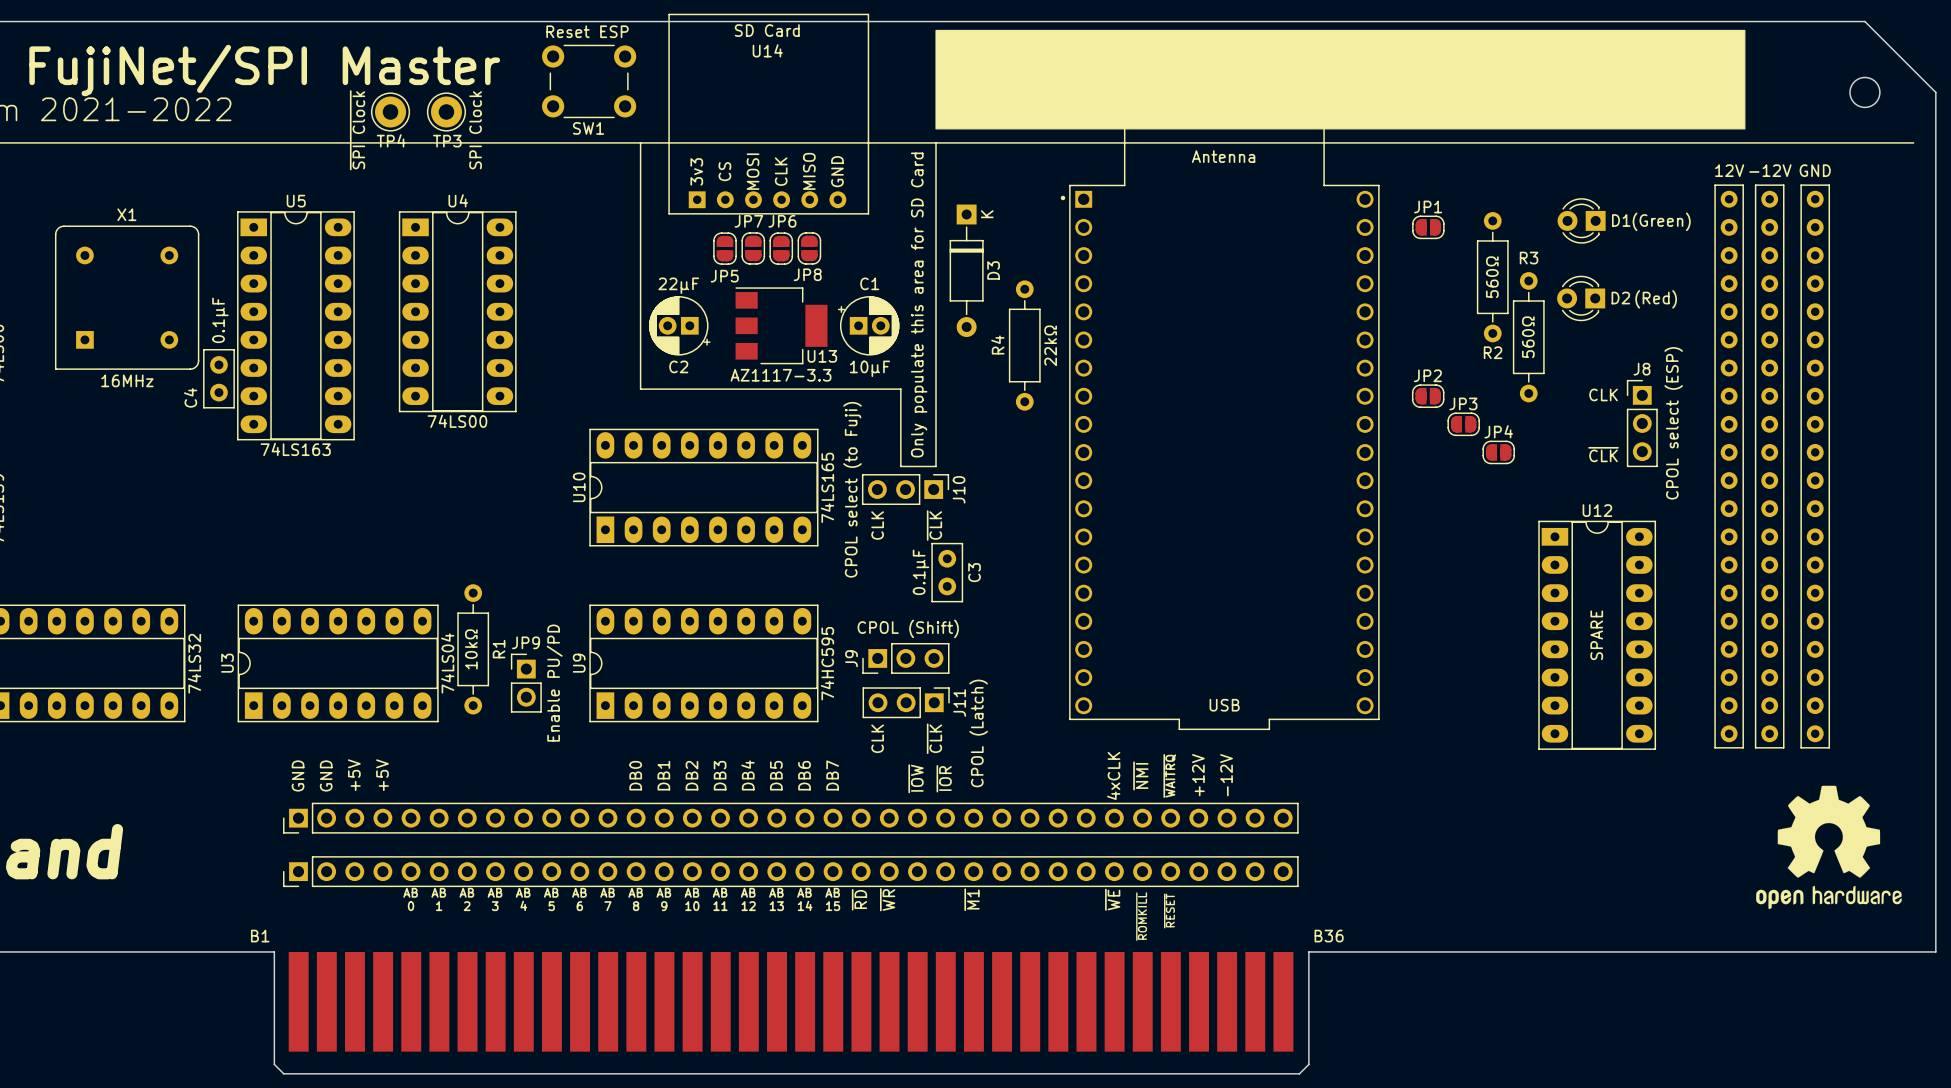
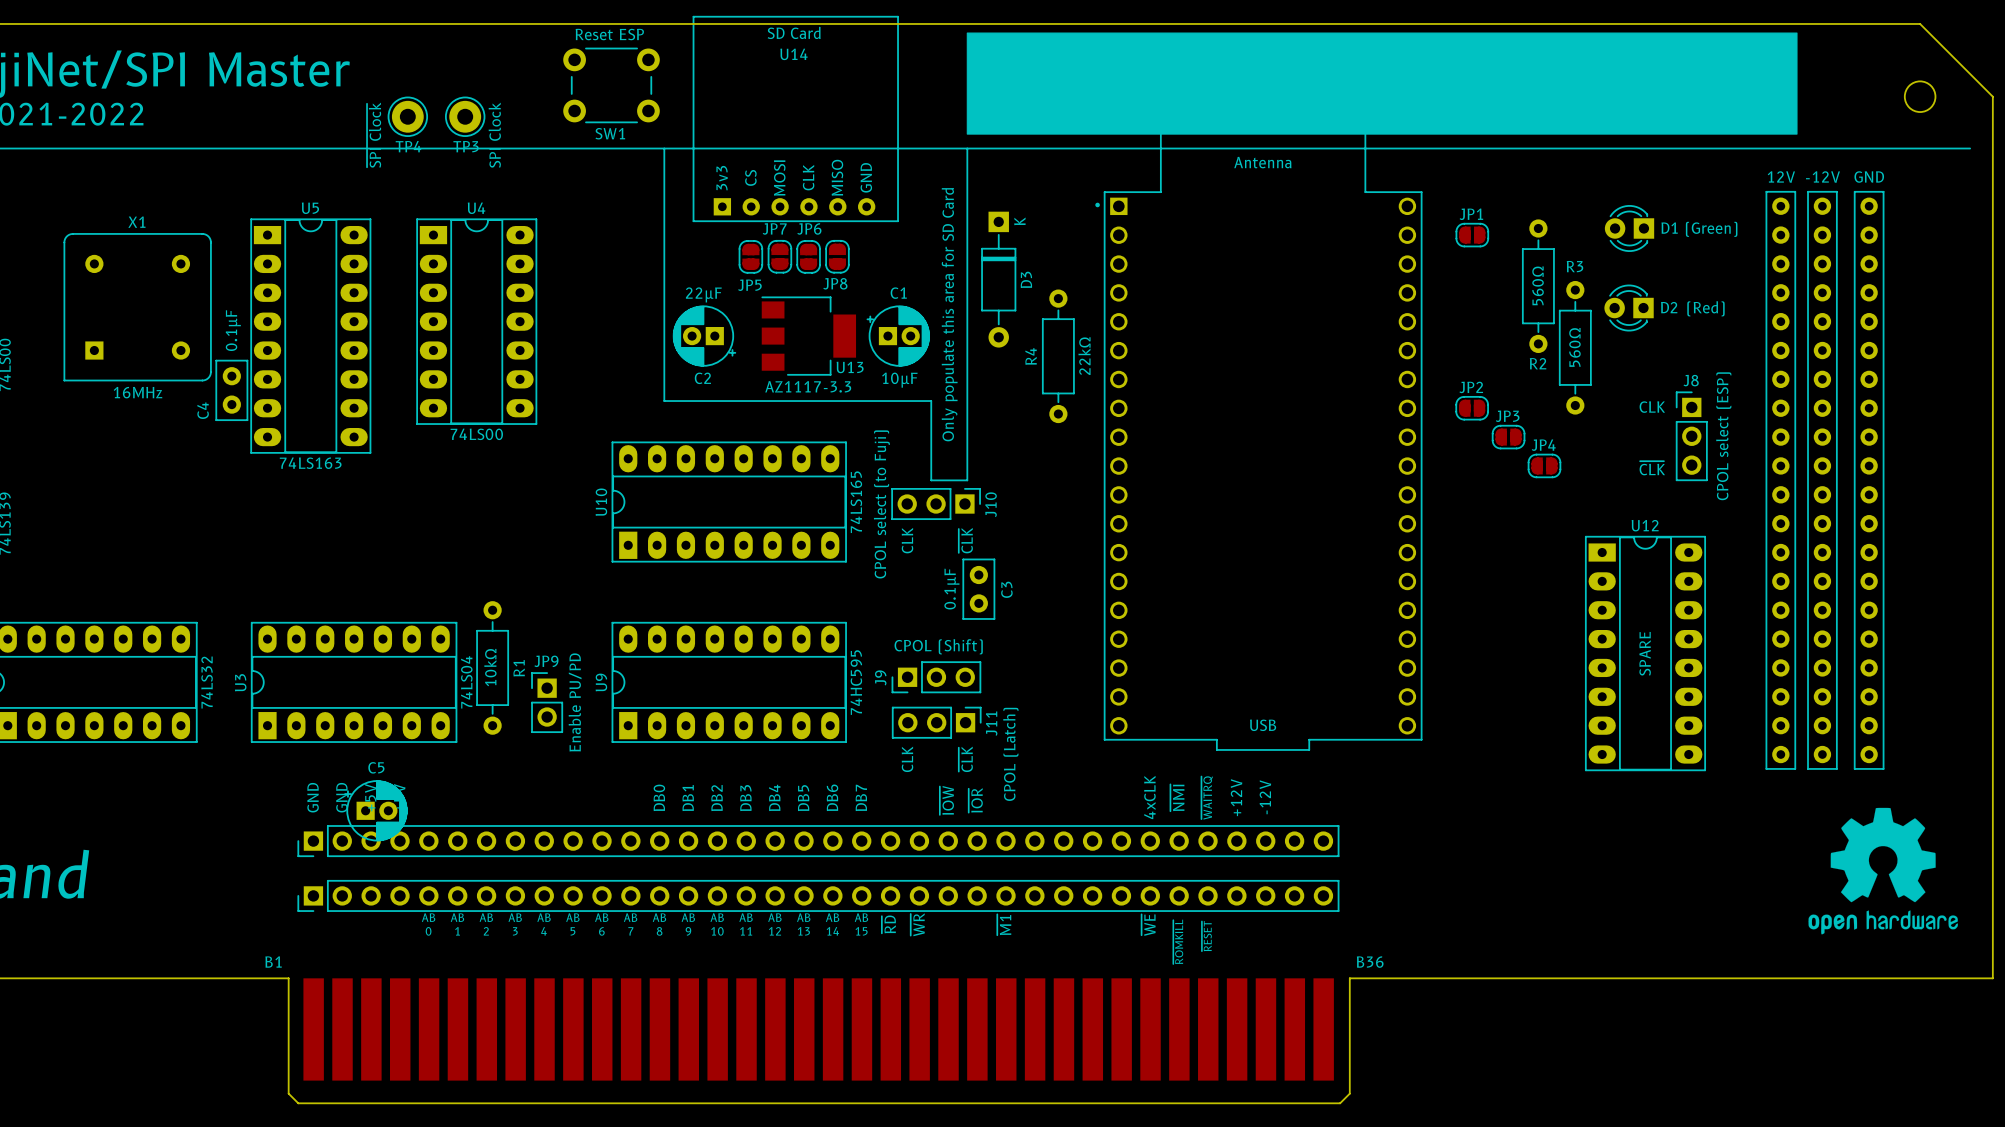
C5: none -> (375, 810)

